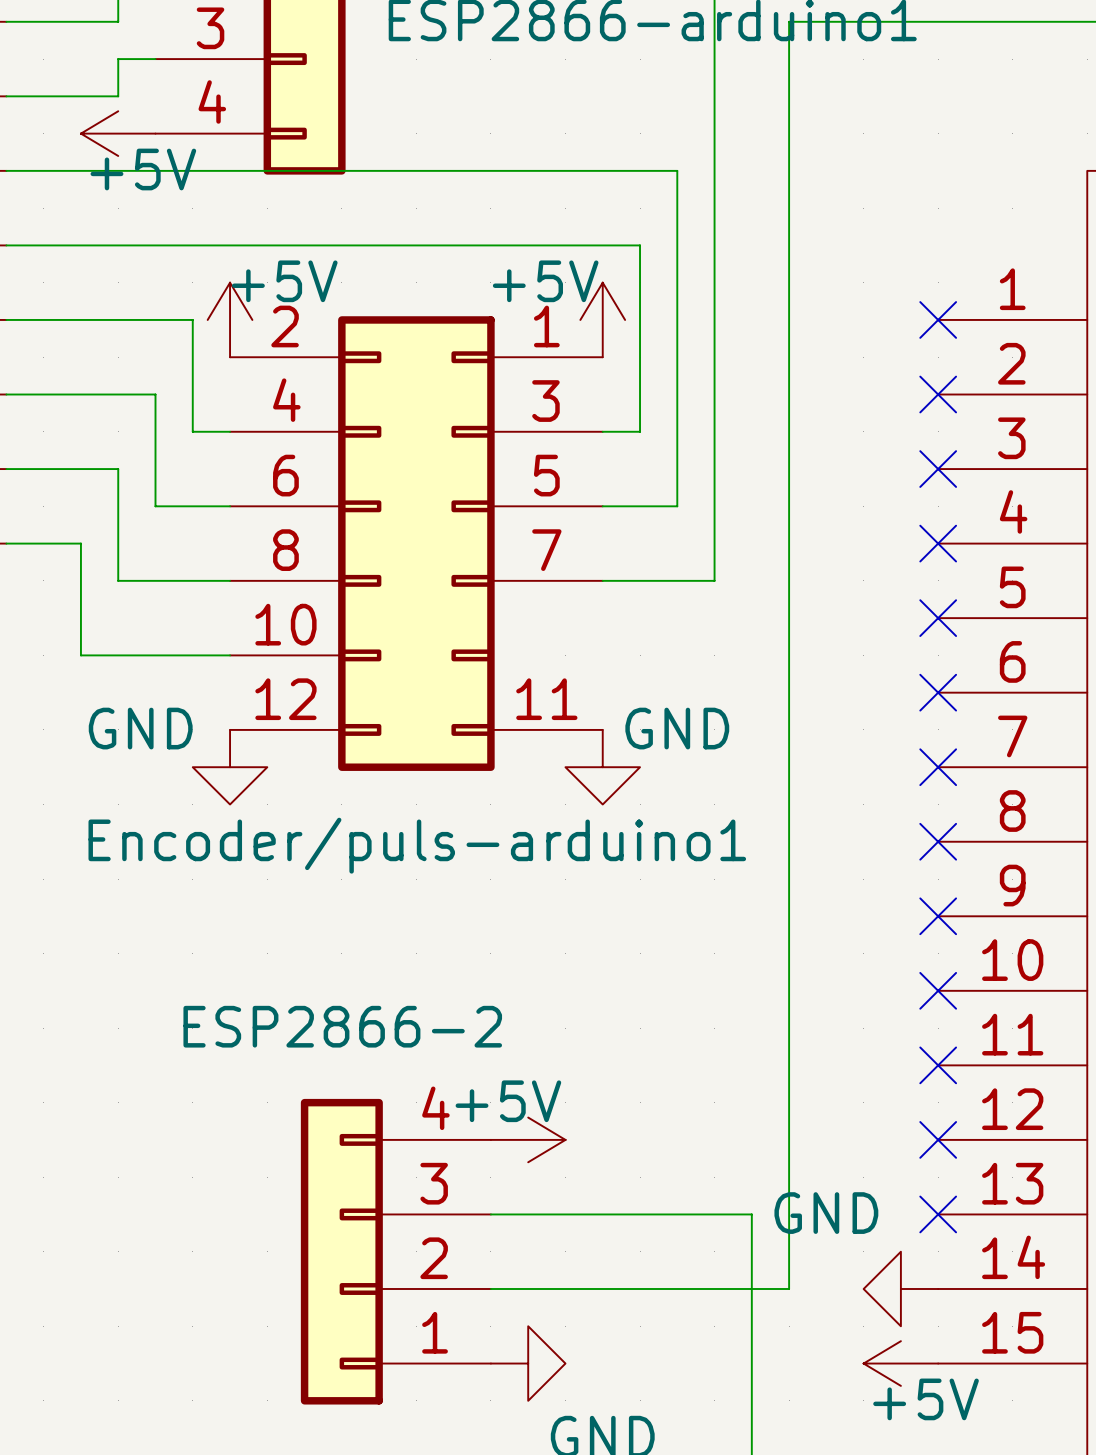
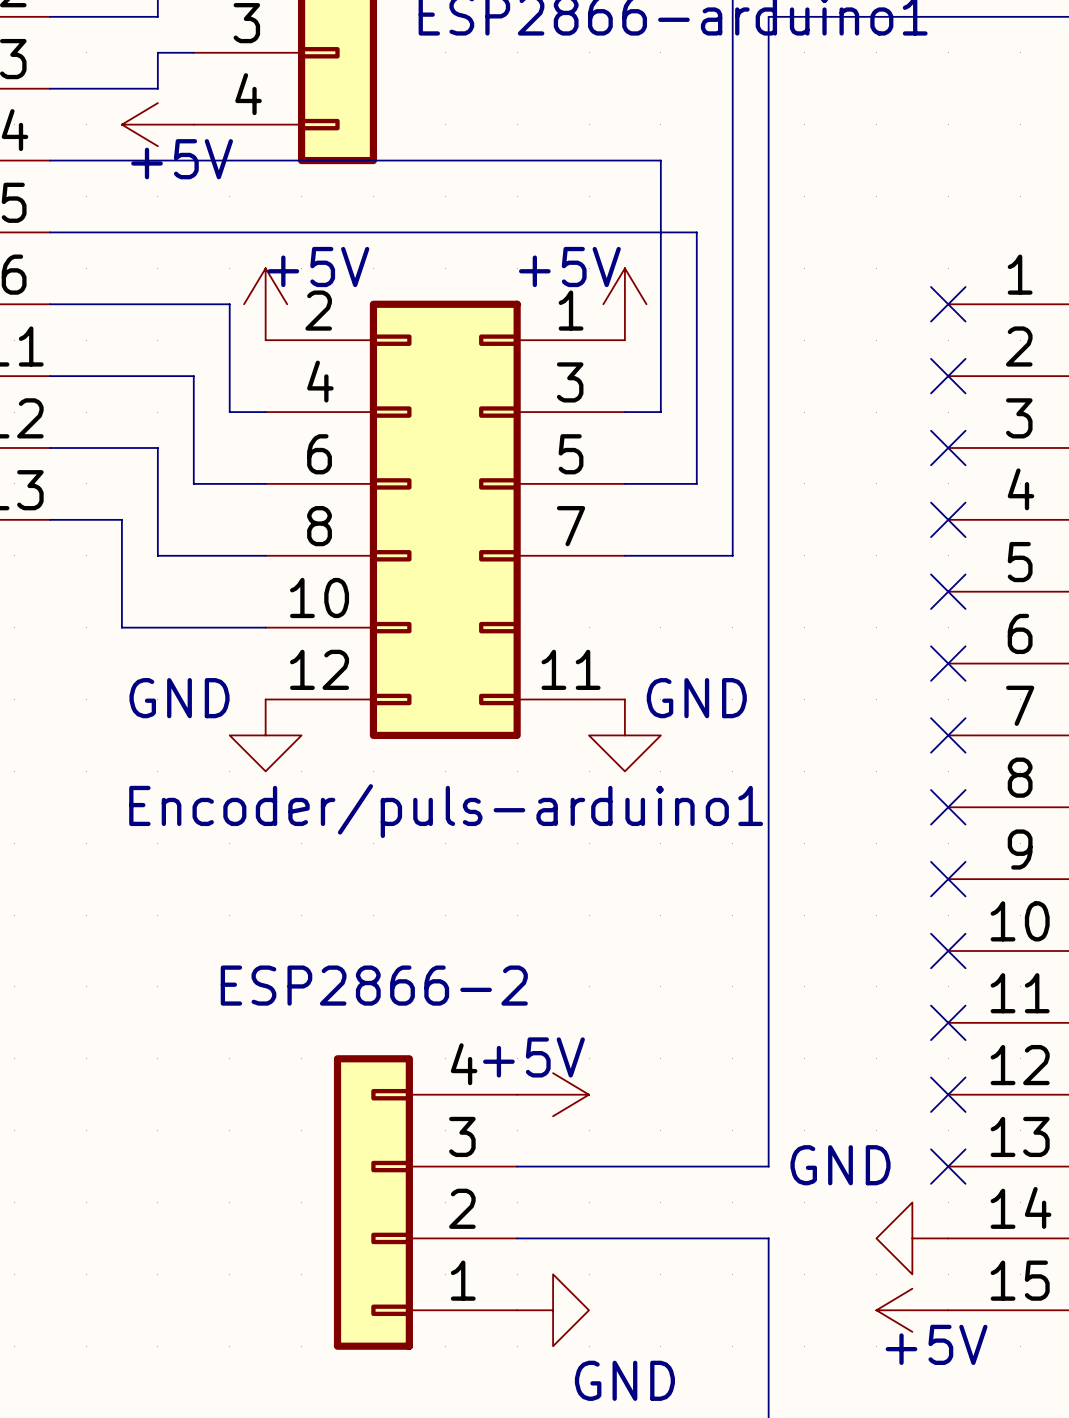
wire: (789, 21) (789, 1288) (751, 1288) (751, 1214) -> (804, 16) (768, 16) (768, 1166)
wire: (640, 170) (677, 170) (677, 245) -> (660, 160) (660, 232) (696, 232)

